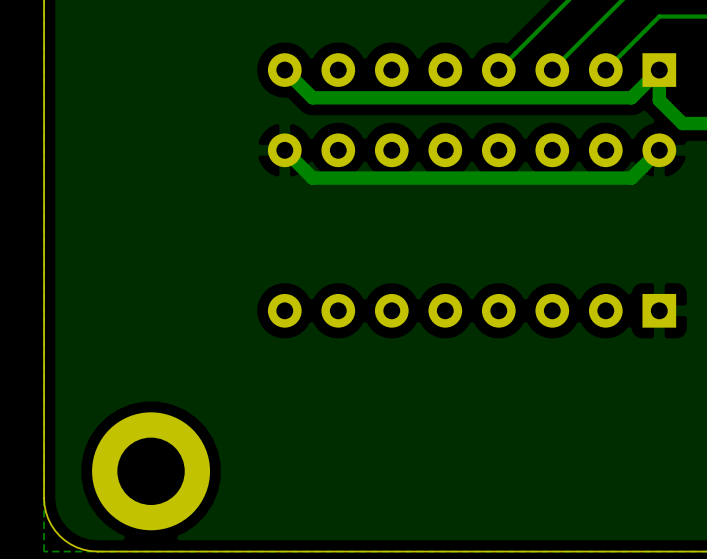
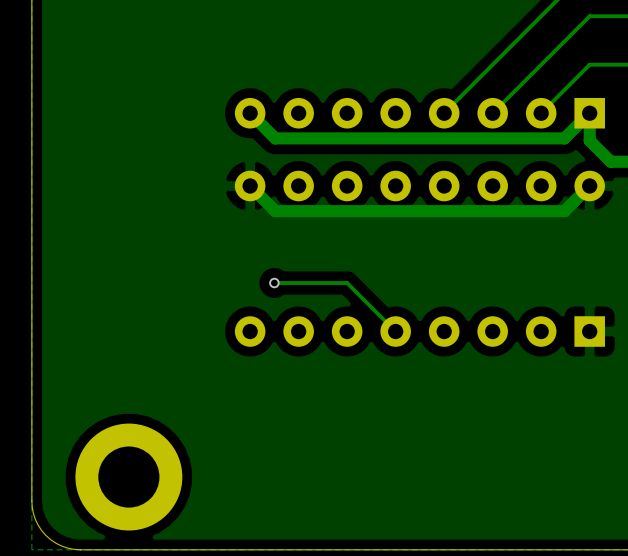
track: none -> (274, 283) (347, 283) (395, 331)
via: none -> (274, 283)

